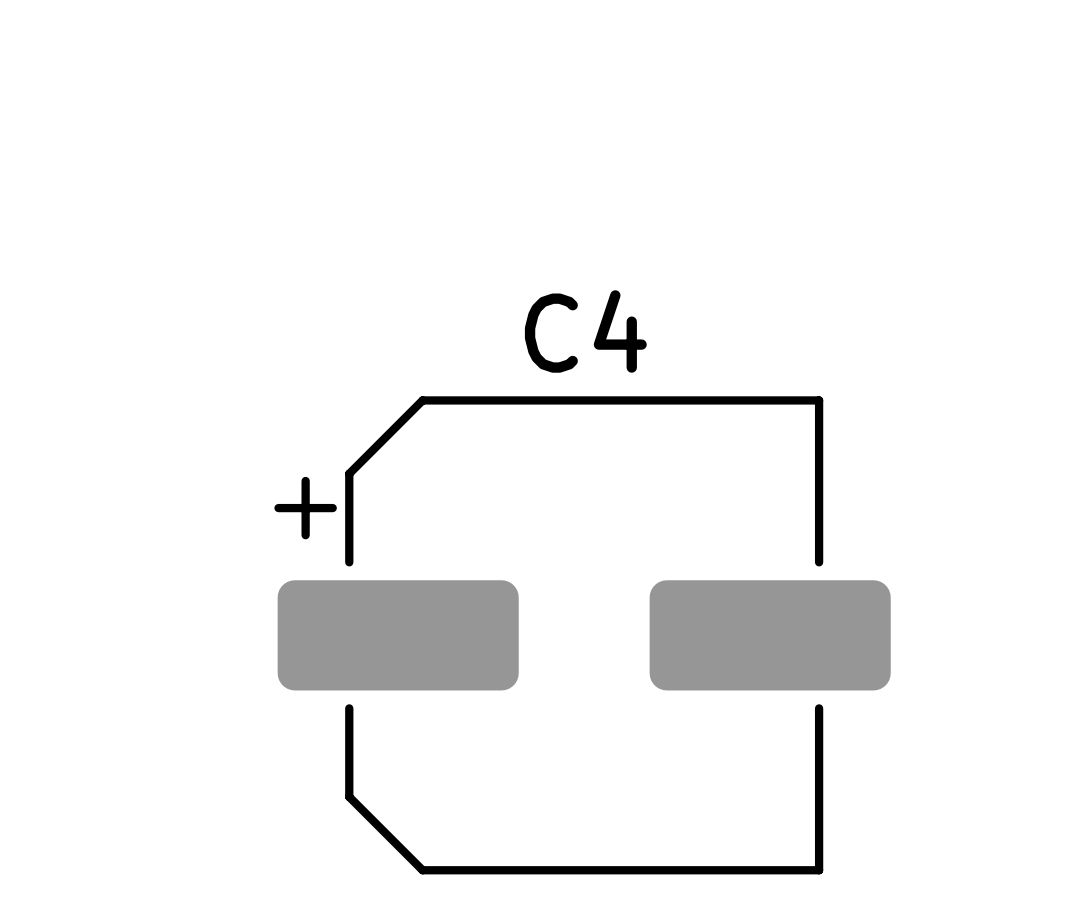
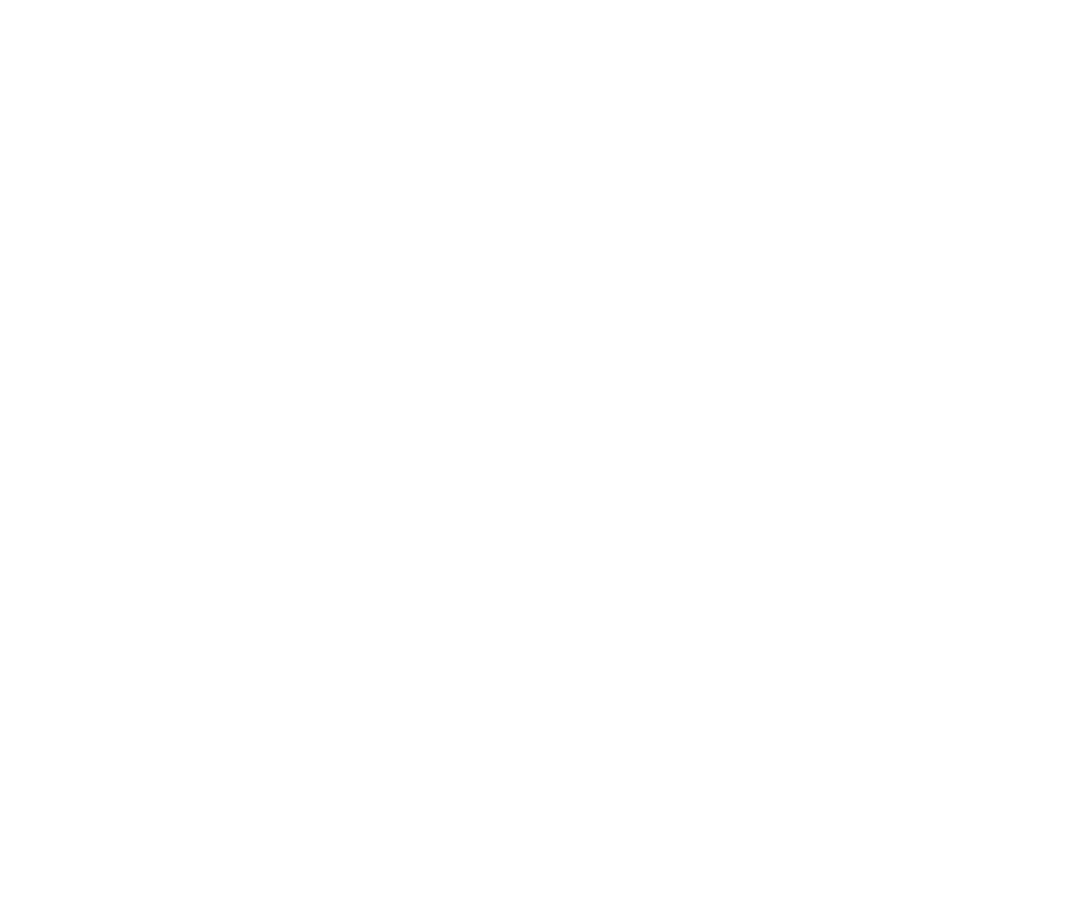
C4: (582, 635) -> none

